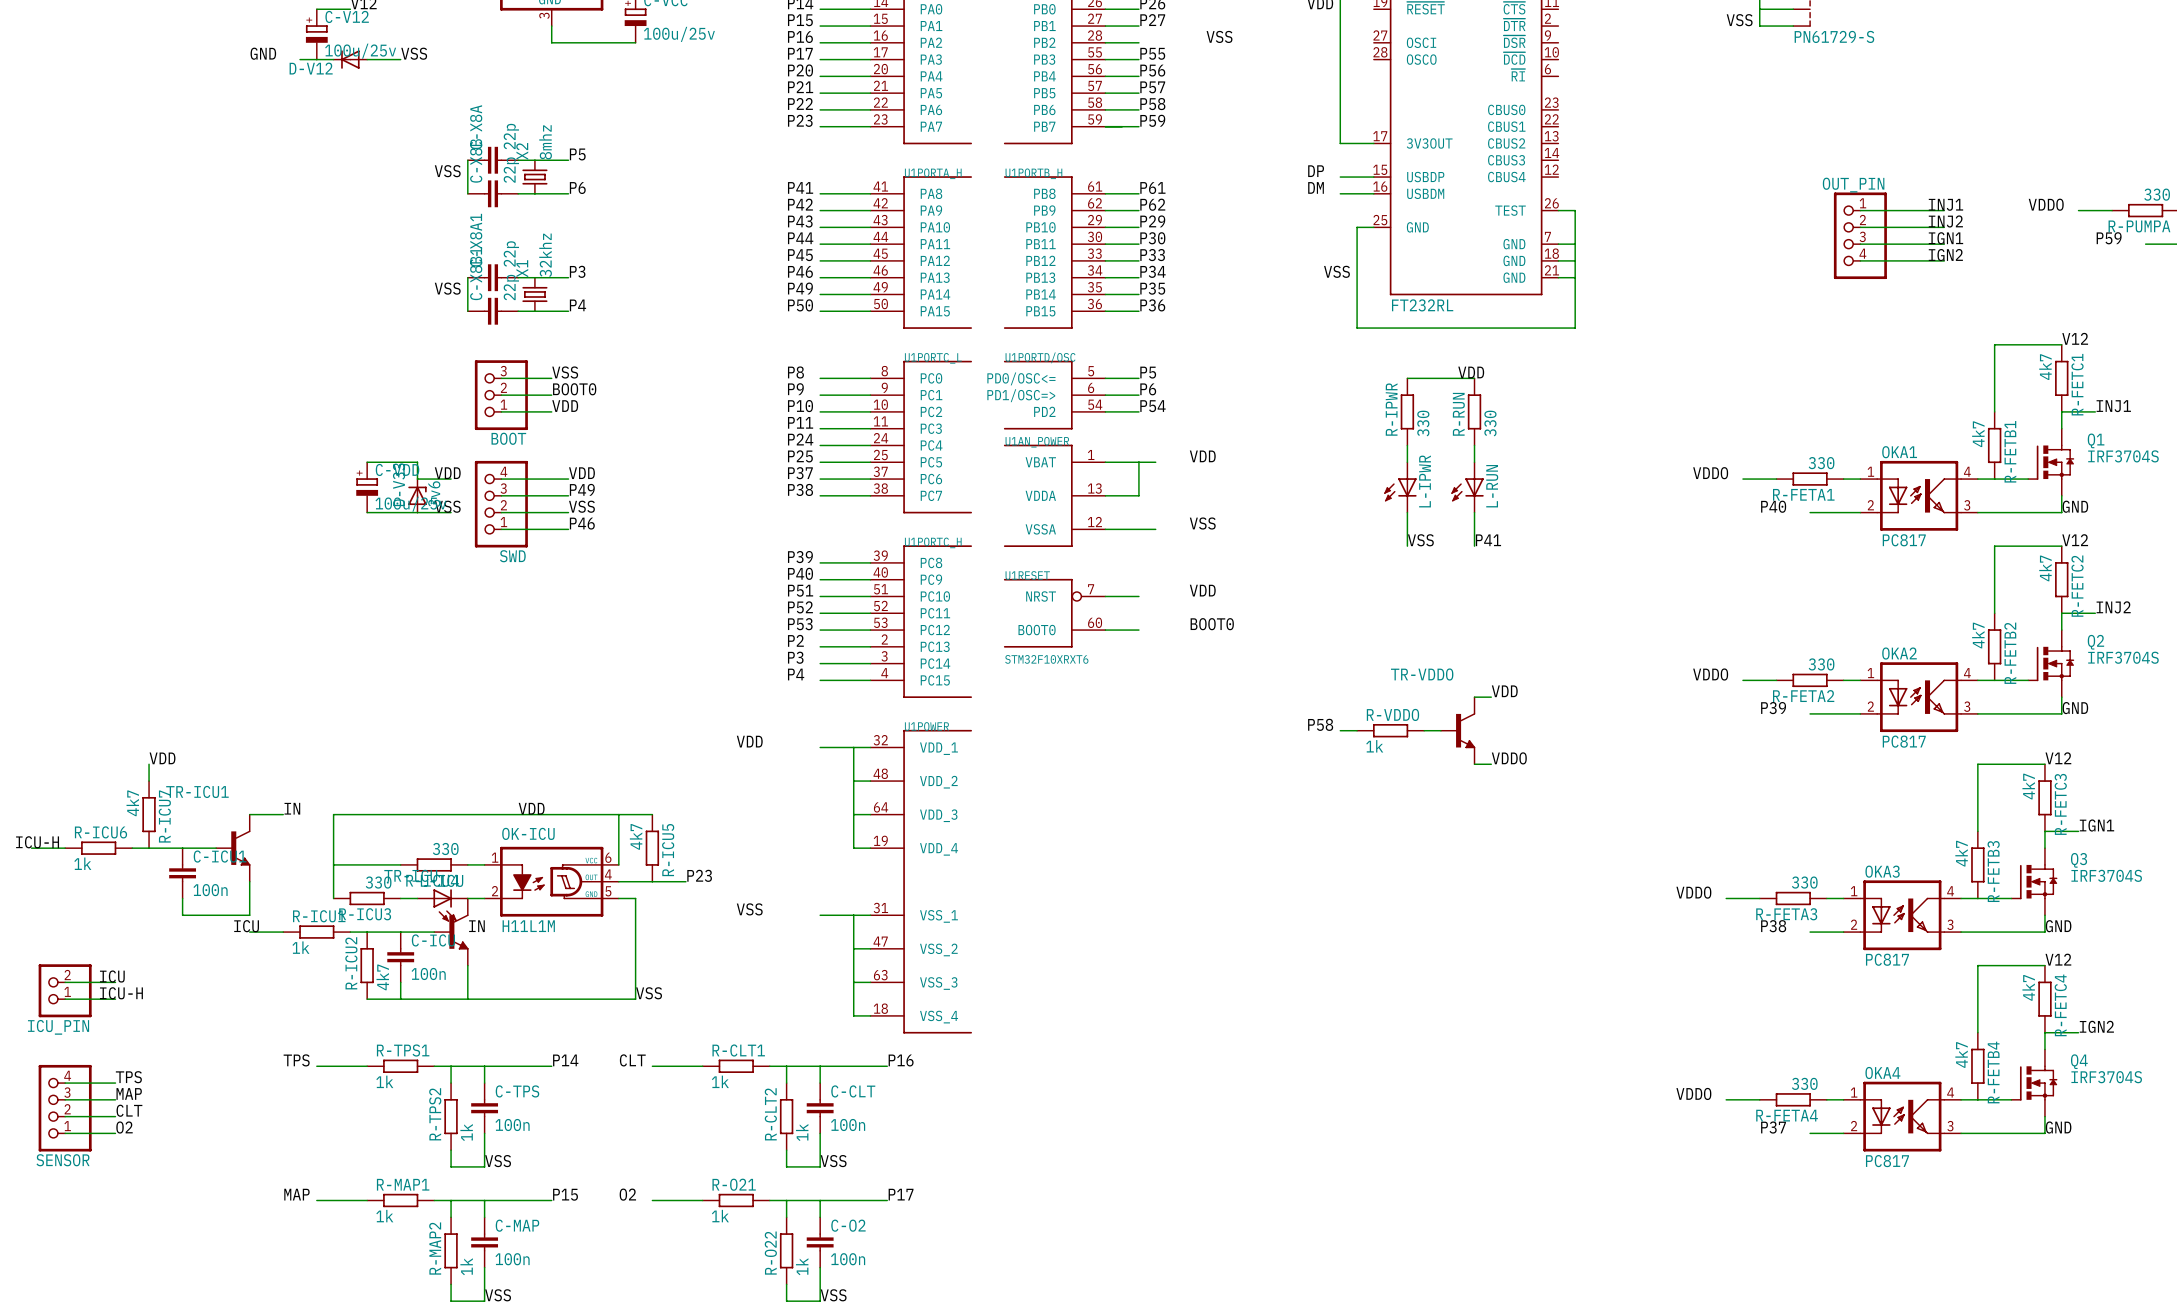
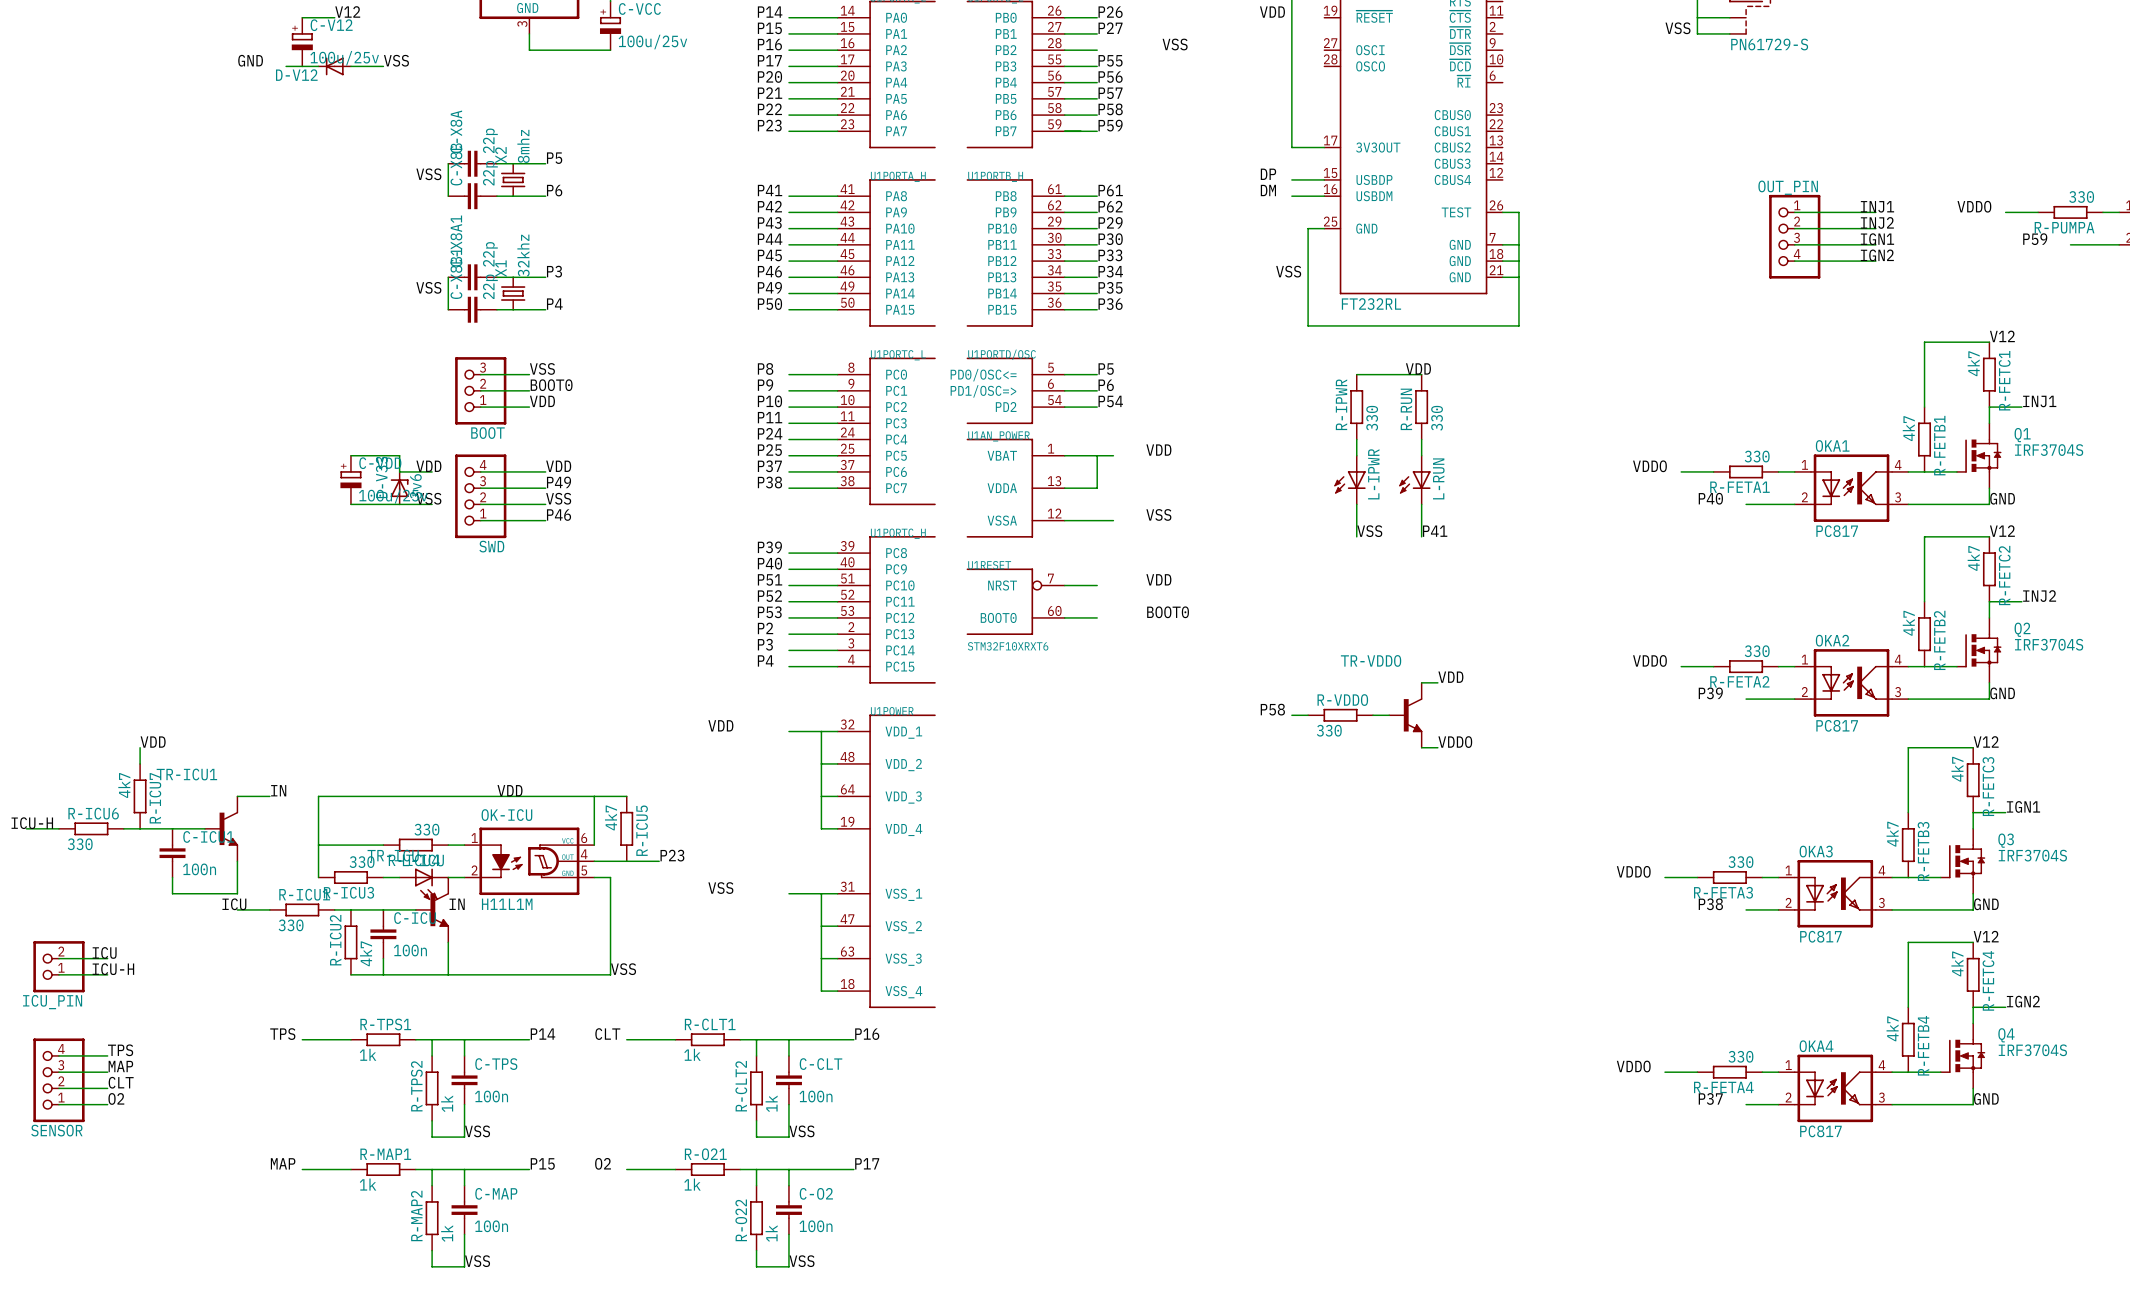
R-VDDO value: 1k (1374, 746) -> 330 (1329, 730)
R-ICU6 value: 1k (82, 863) -> 330 (80, 844)
R-ICU1 value: 1k (300, 947) -> 330 (291, 925)

